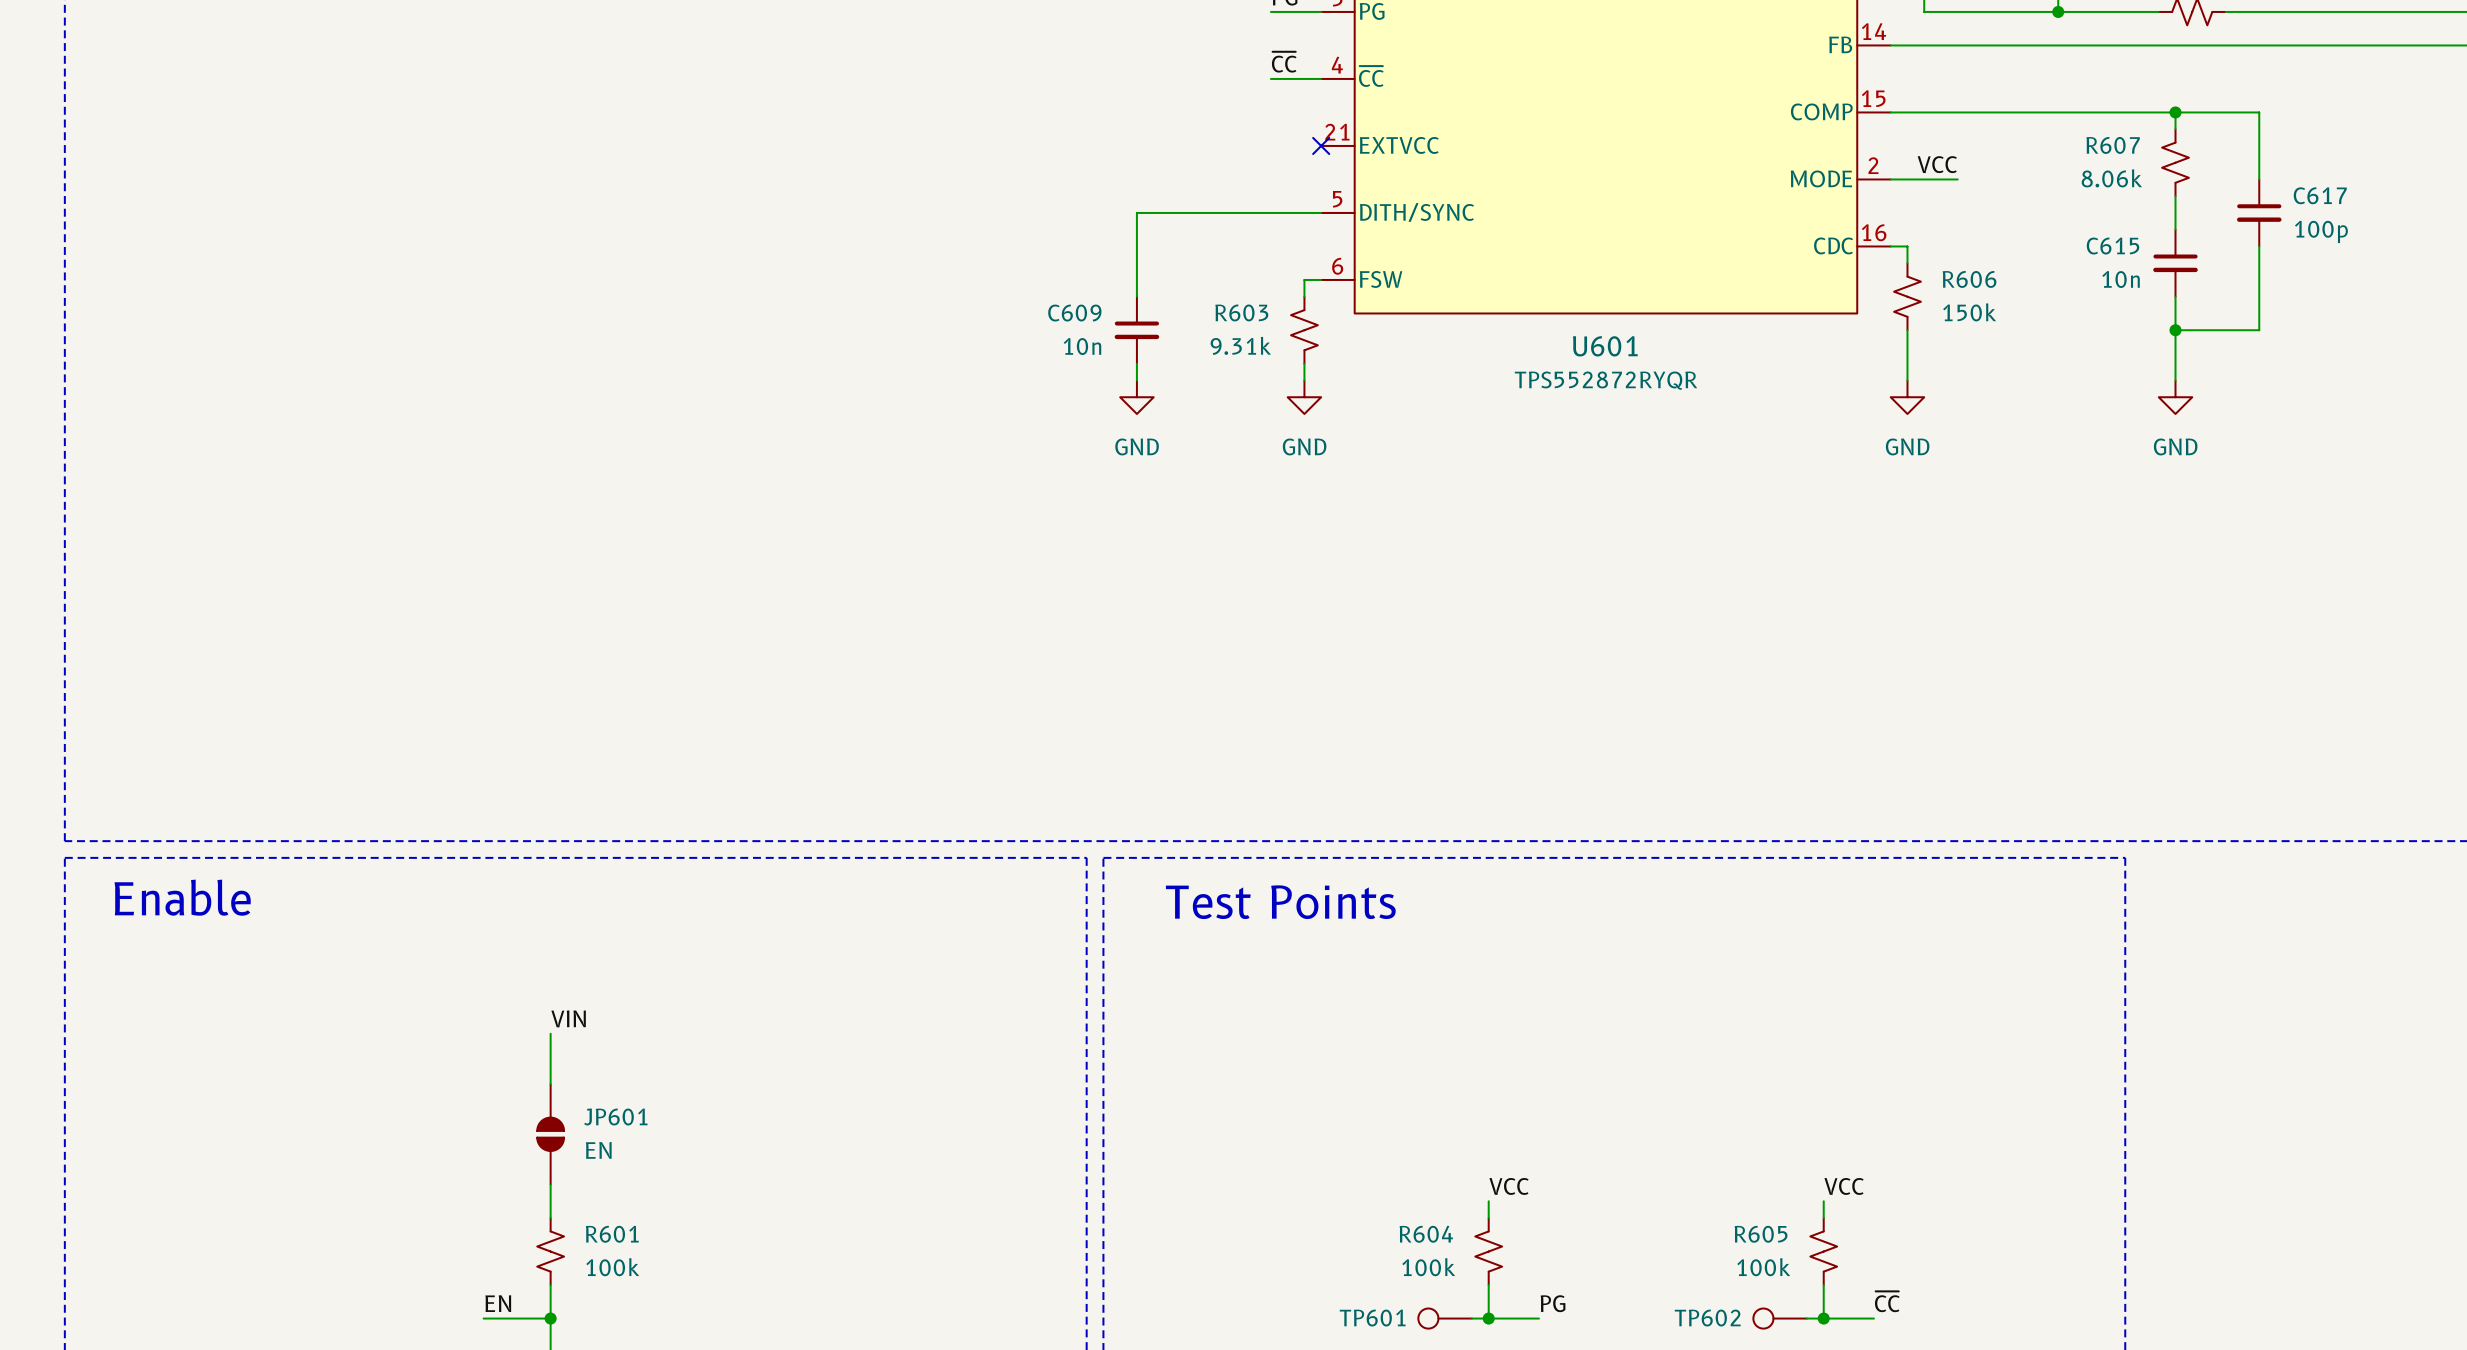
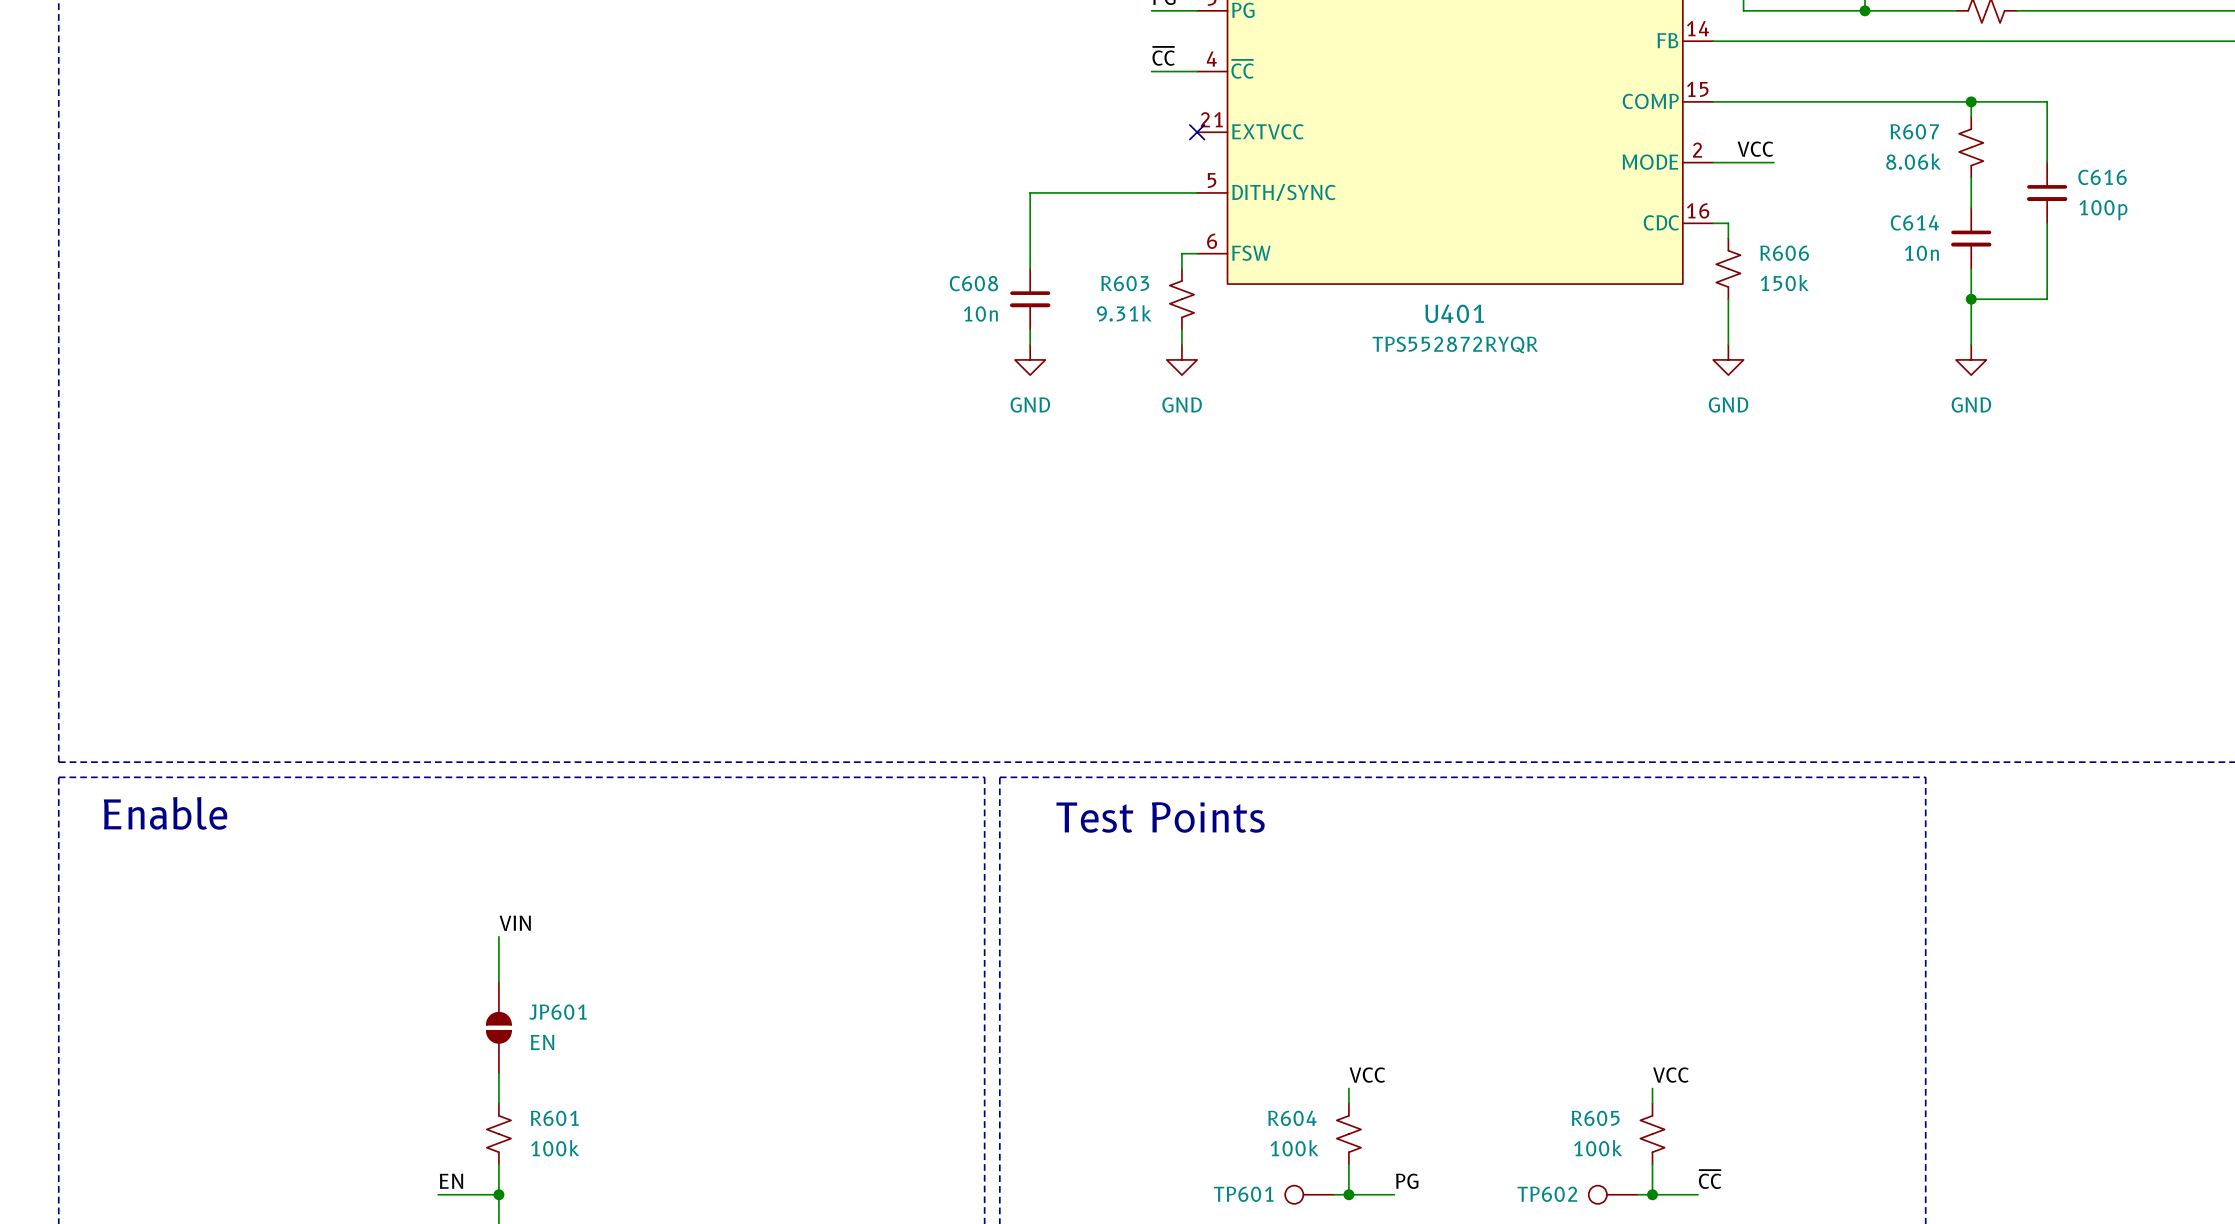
C617 name: C617 (2320, 195) -> C616 (2102, 177)
C615 name: C615 (2113, 246) -> C614 (1914, 222)
C609 name: C609 (1074, 313) -> C608 (973, 283)
U601 name: U601 (1605, 346) -> U401 (1454, 313)

